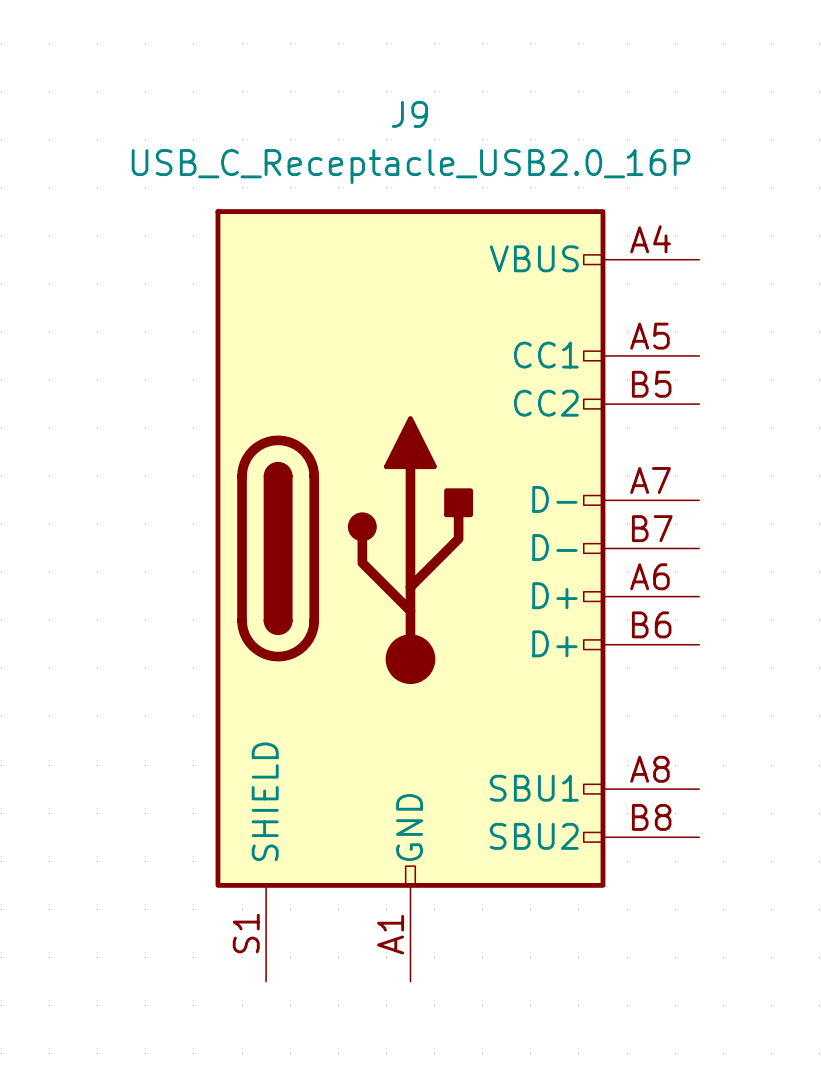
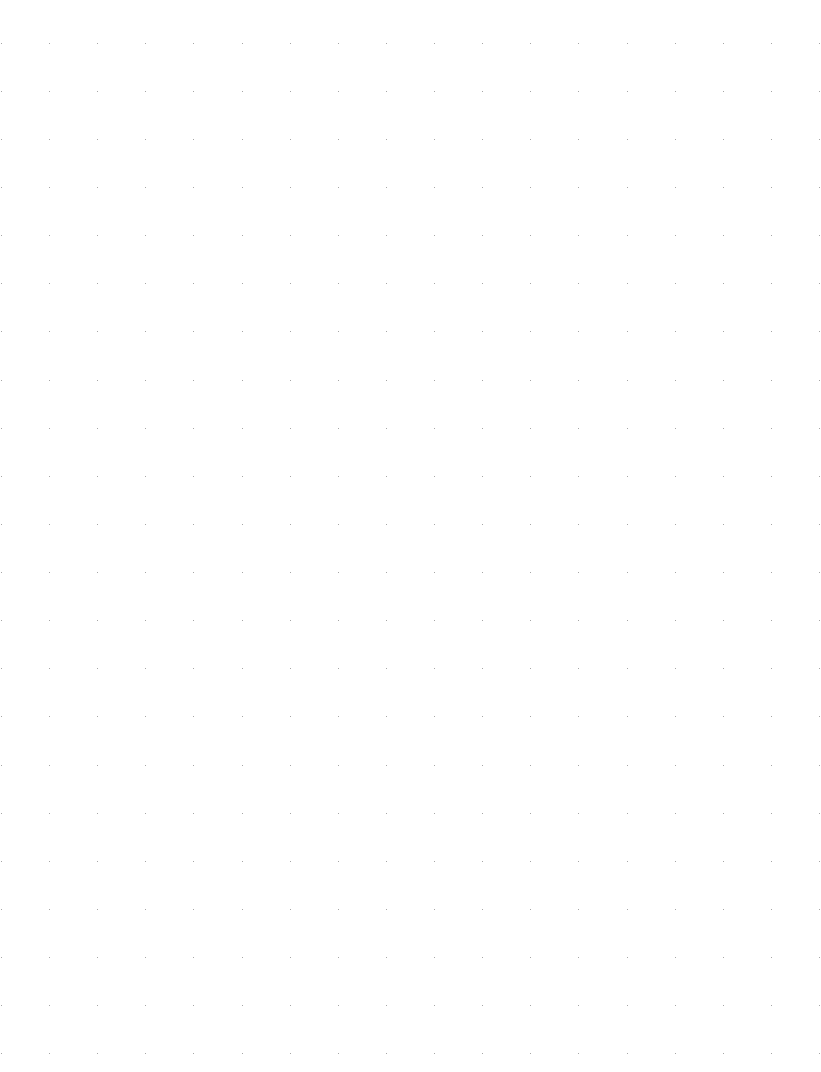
J9: USB_C_Receptacle_USB2.0_16P (457, 595) -> none

